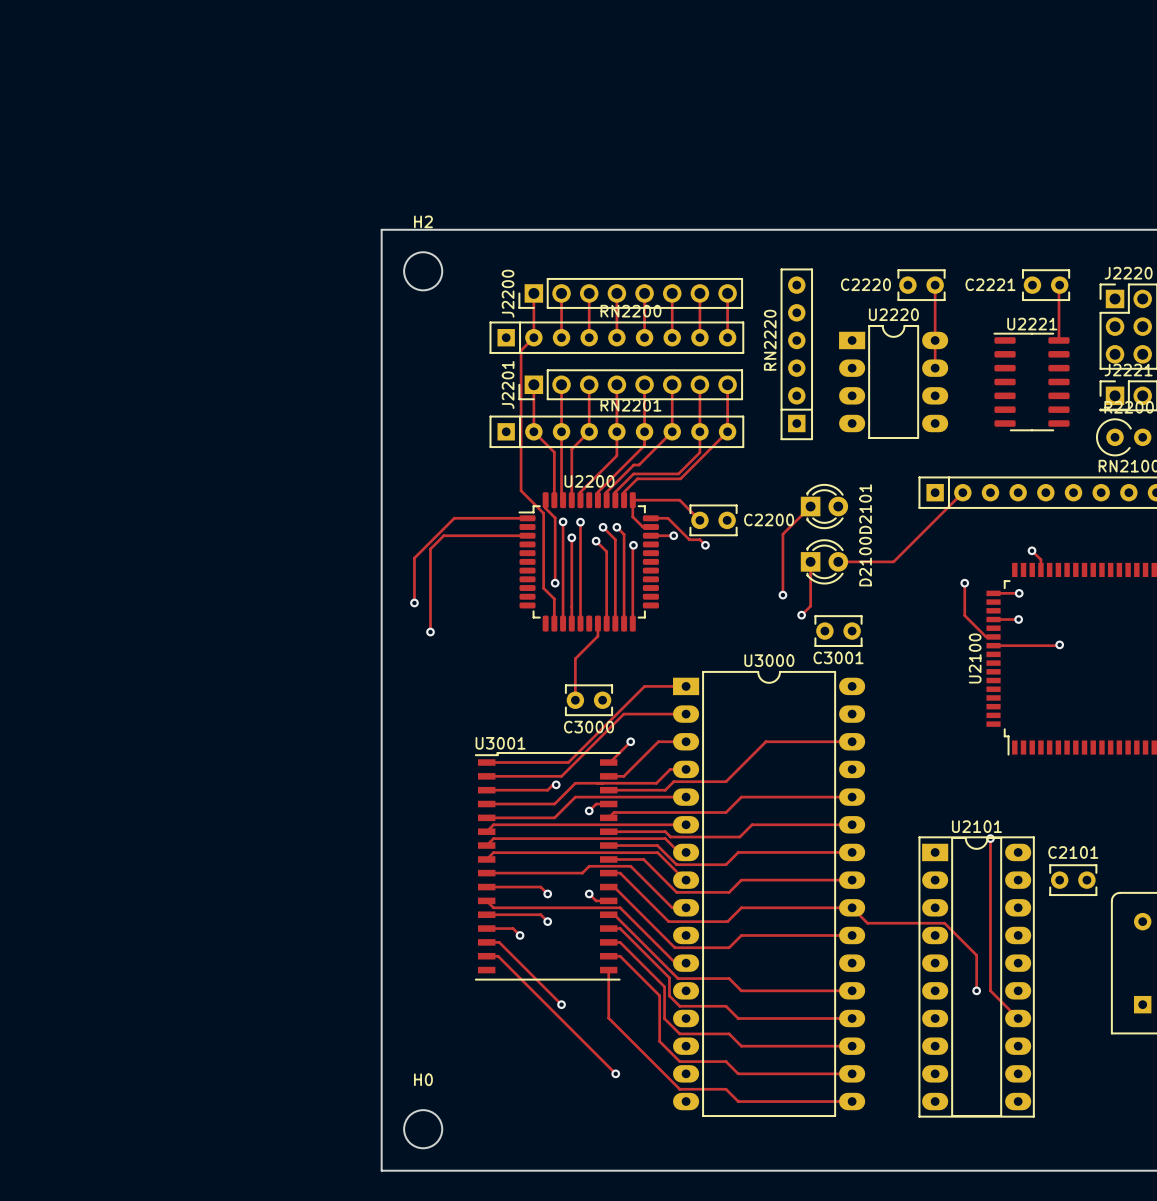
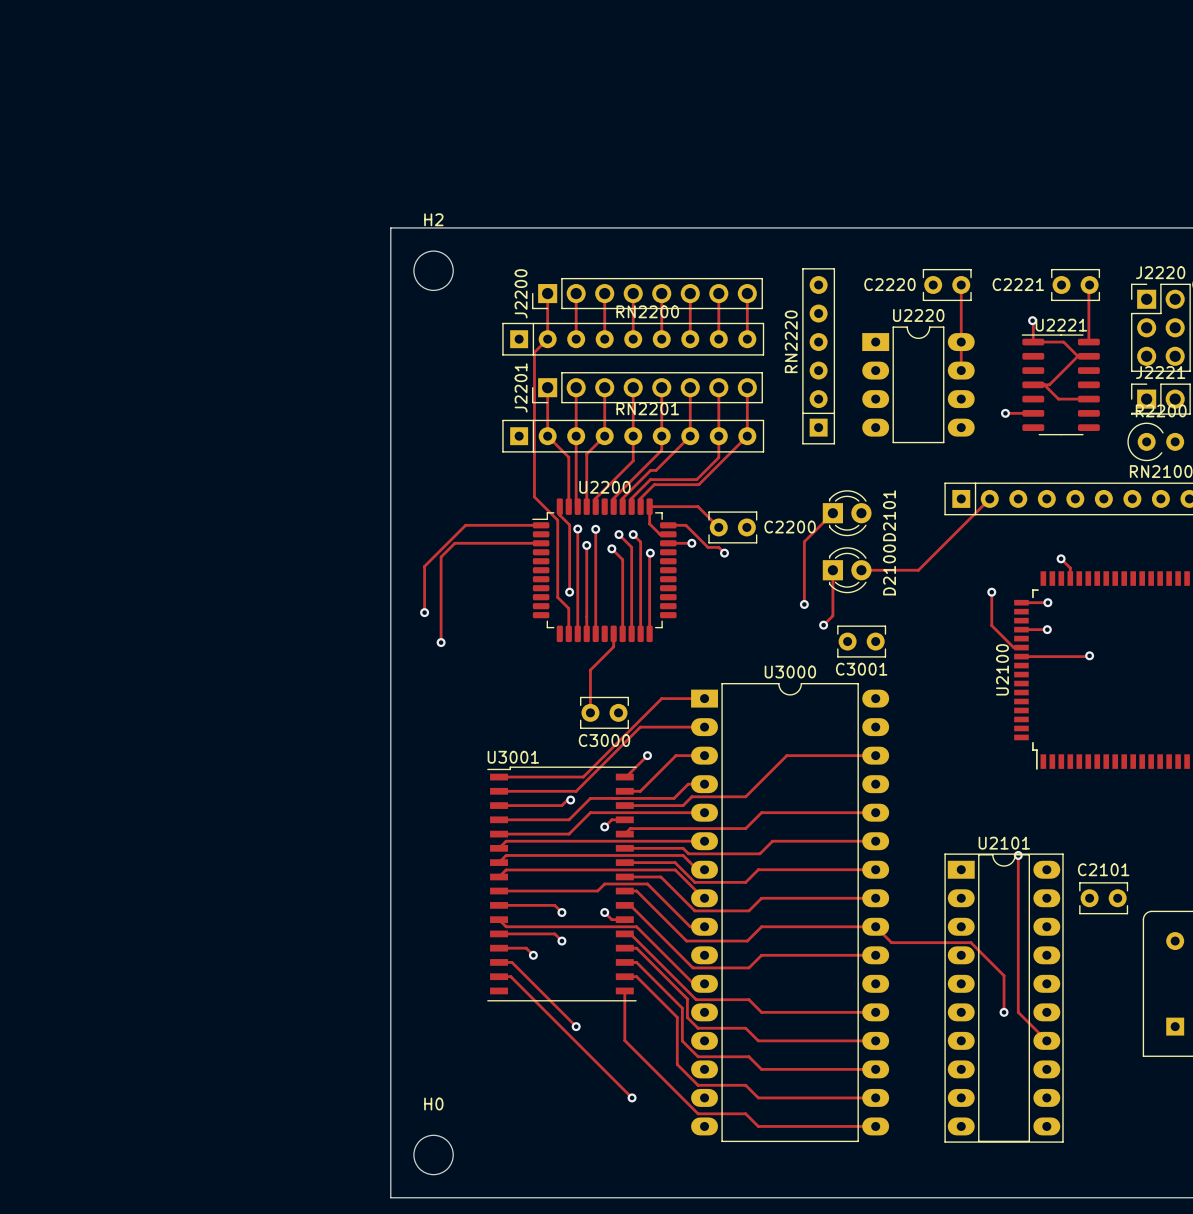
track: none -> (1032, 320) (1033, 342) (1063, 342) (1077, 356)
via: none -> (1032, 320)
track: none -> (1077, 356) (1049, 384) (1033, 384)
track: none -> (1044, 384) (1058, 399) (1088, 399)
track: none -> (1005, 413) (1033, 413)
via: none -> (1005, 413)

